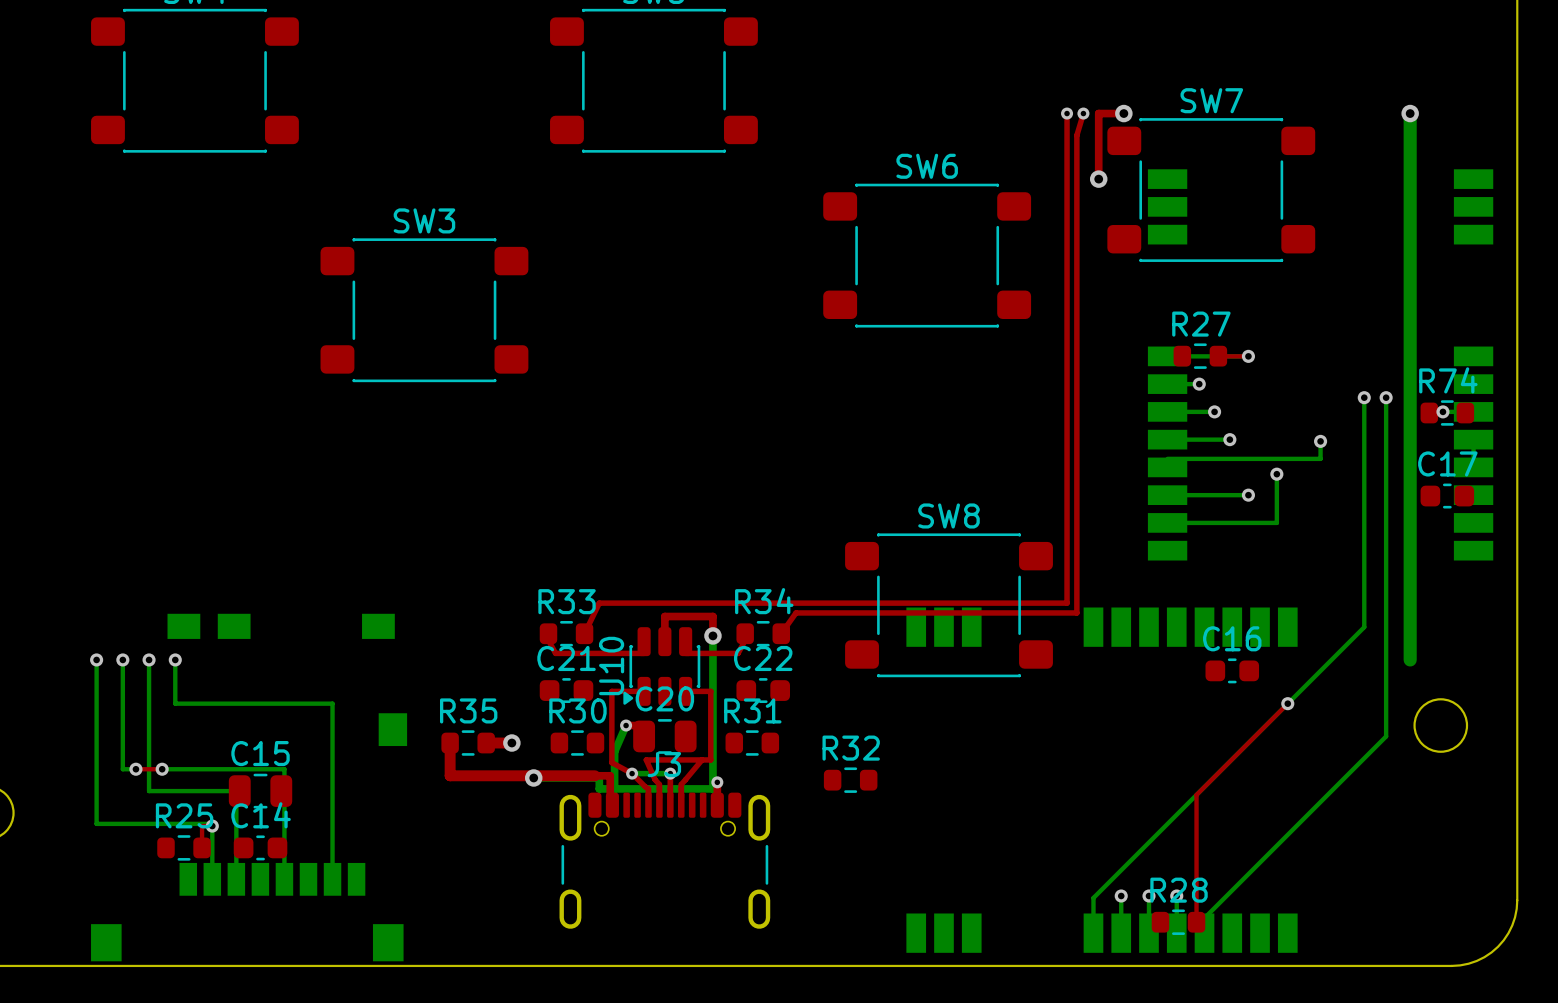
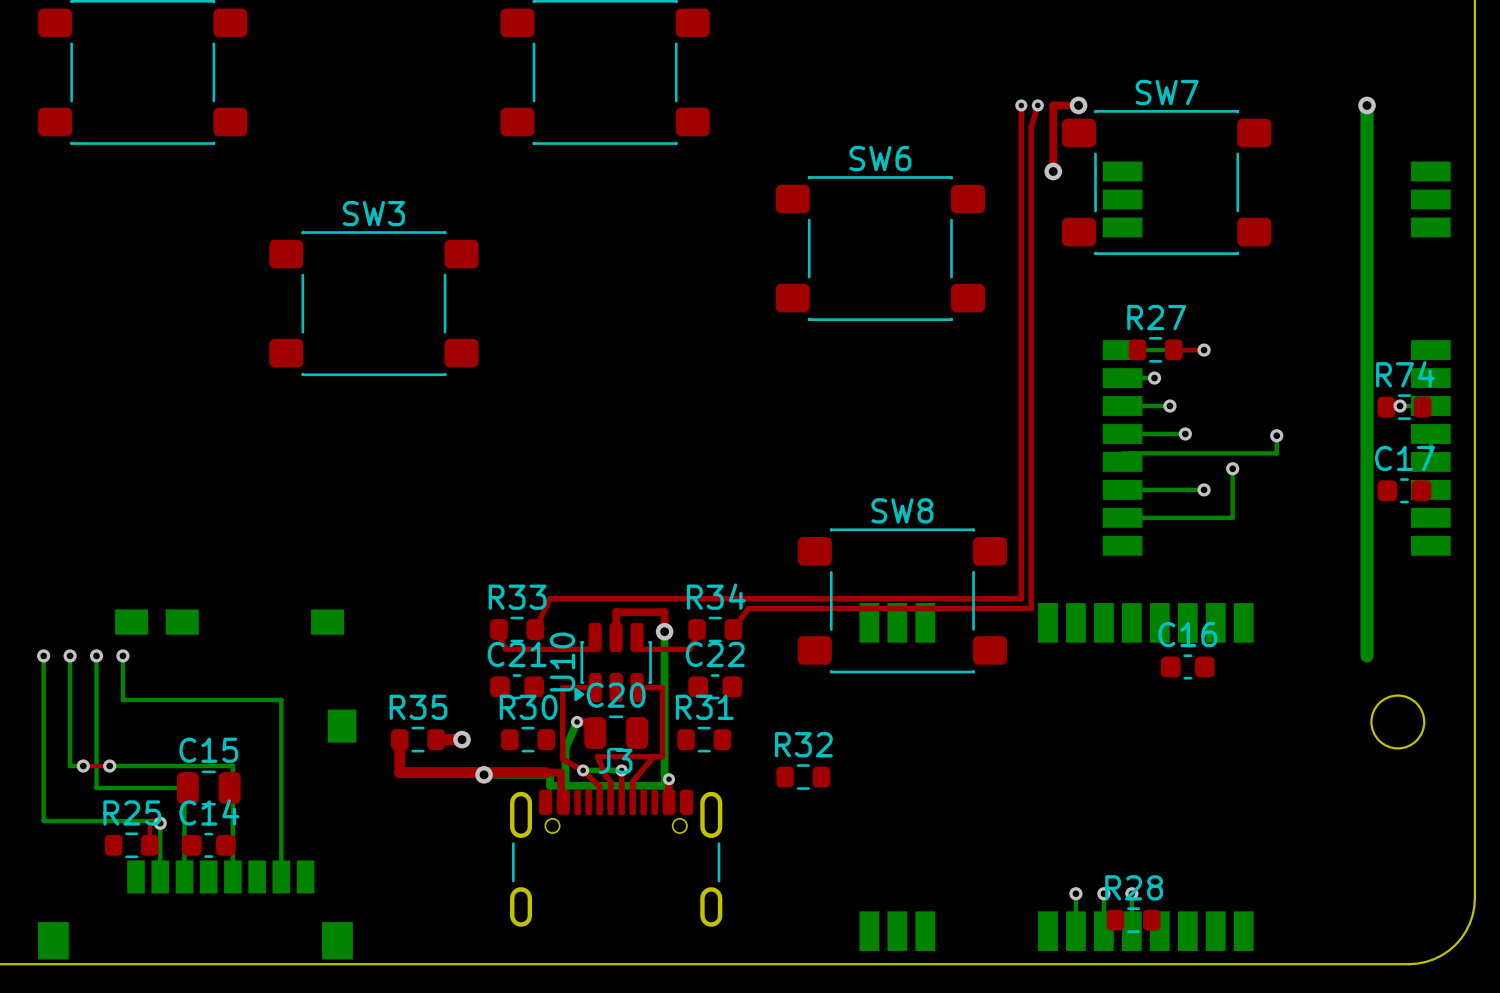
bottom track: (1364, 397) (1364, 627) (1093, 897) (1093, 933) -> none
via: (1364, 397) -> none
bottom track: (1386, 397) (1386, 736) (1204, 918) (1204, 933) -> none
via: (1386, 397) -> none
top track: (1287, 703) (1196, 794) (1196, 922) -> none
via: (1287, 703) -> none

